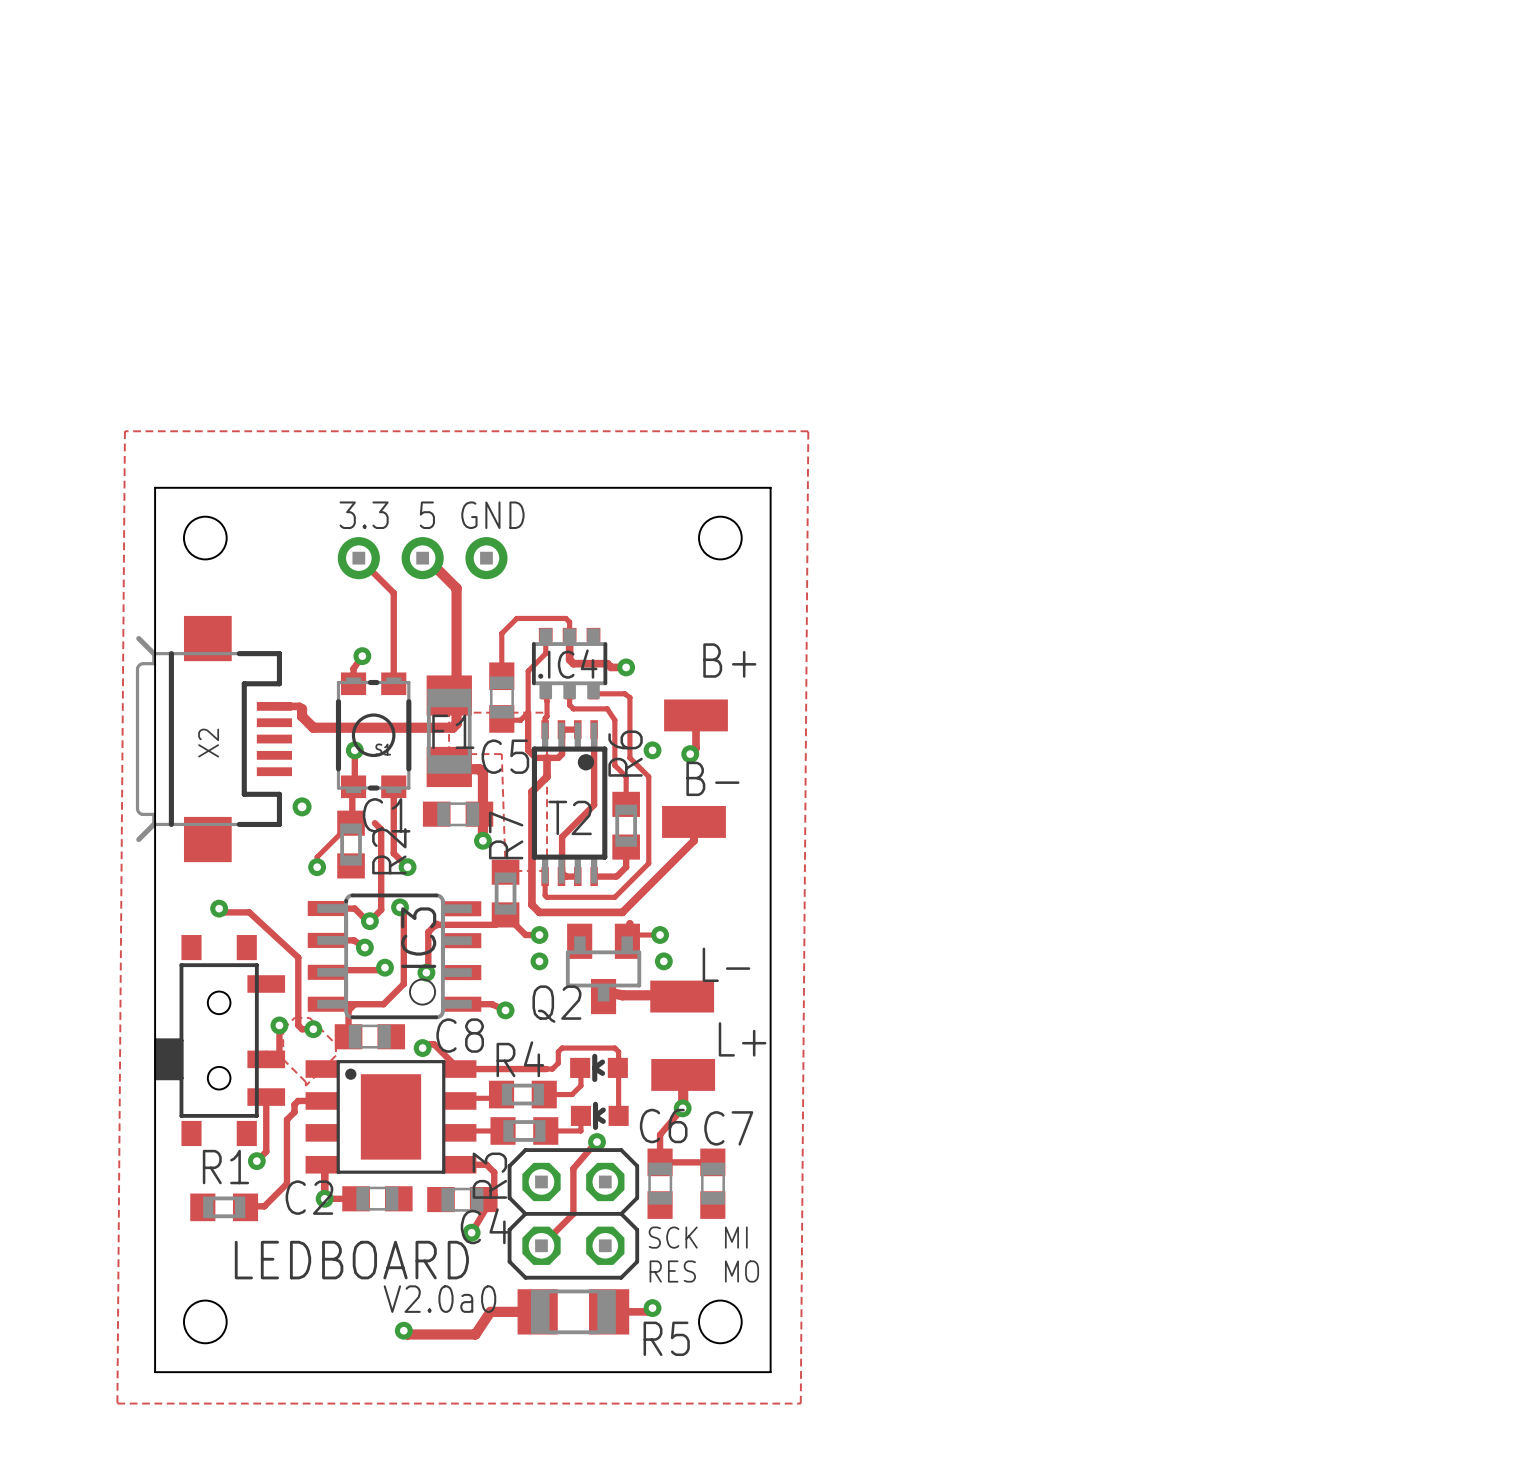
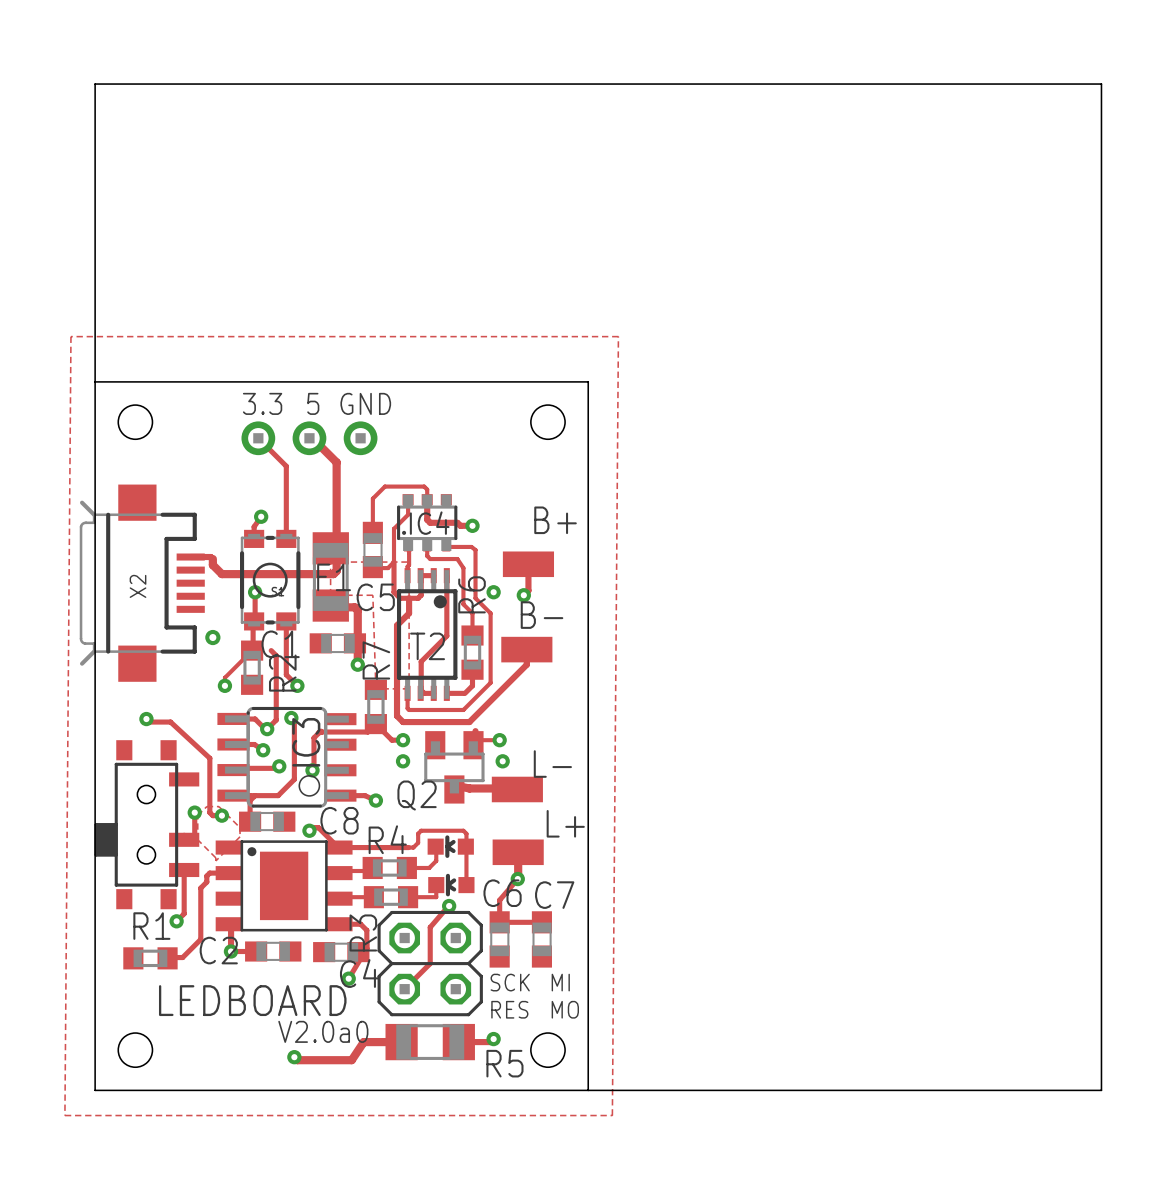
board edge: none -> (95, 381) (95, 84) (1101, 84) (1101, 1090) (588, 1090)

